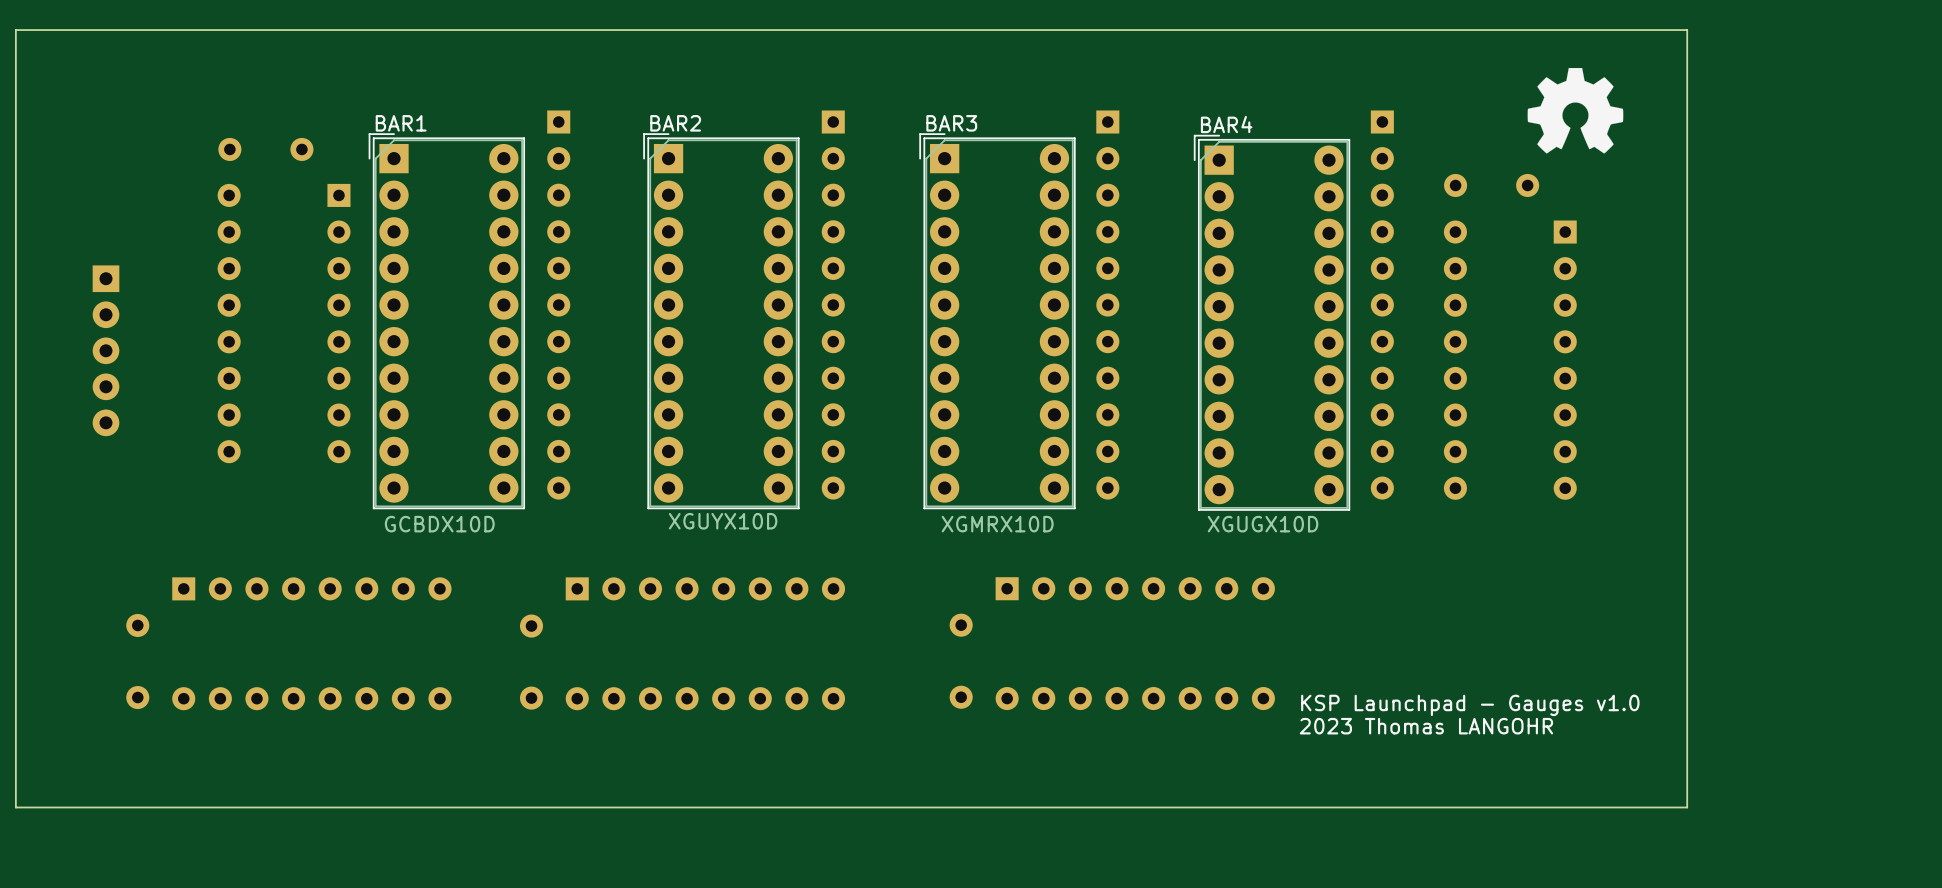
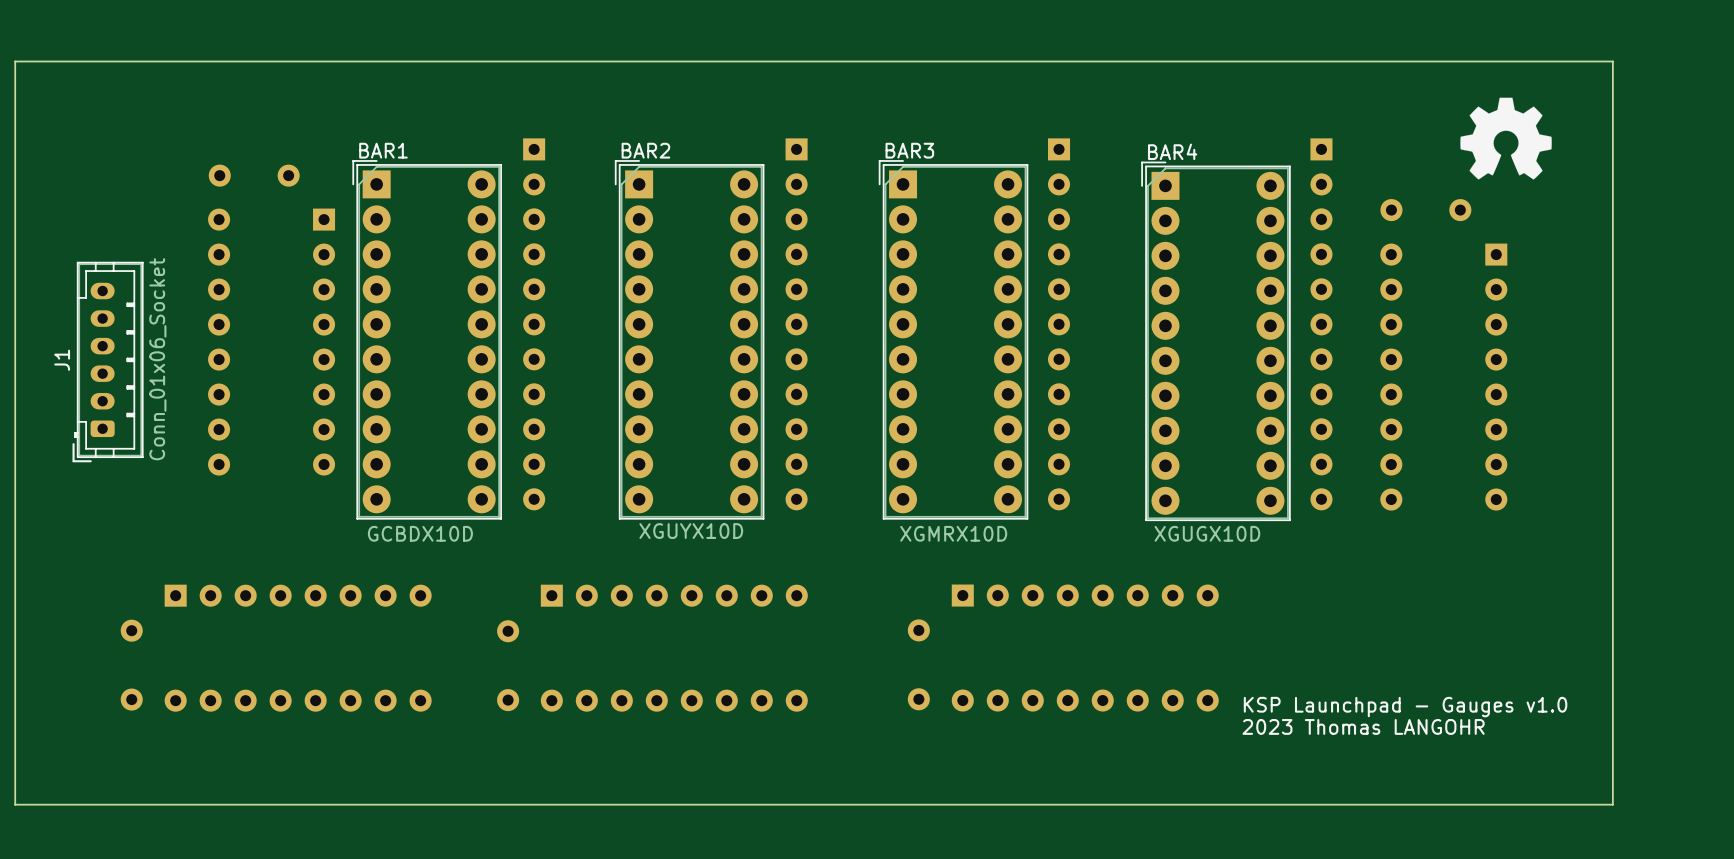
J1: none -> Conn_01x06_Socket (108, 361)
part: (106, 350) -> none

